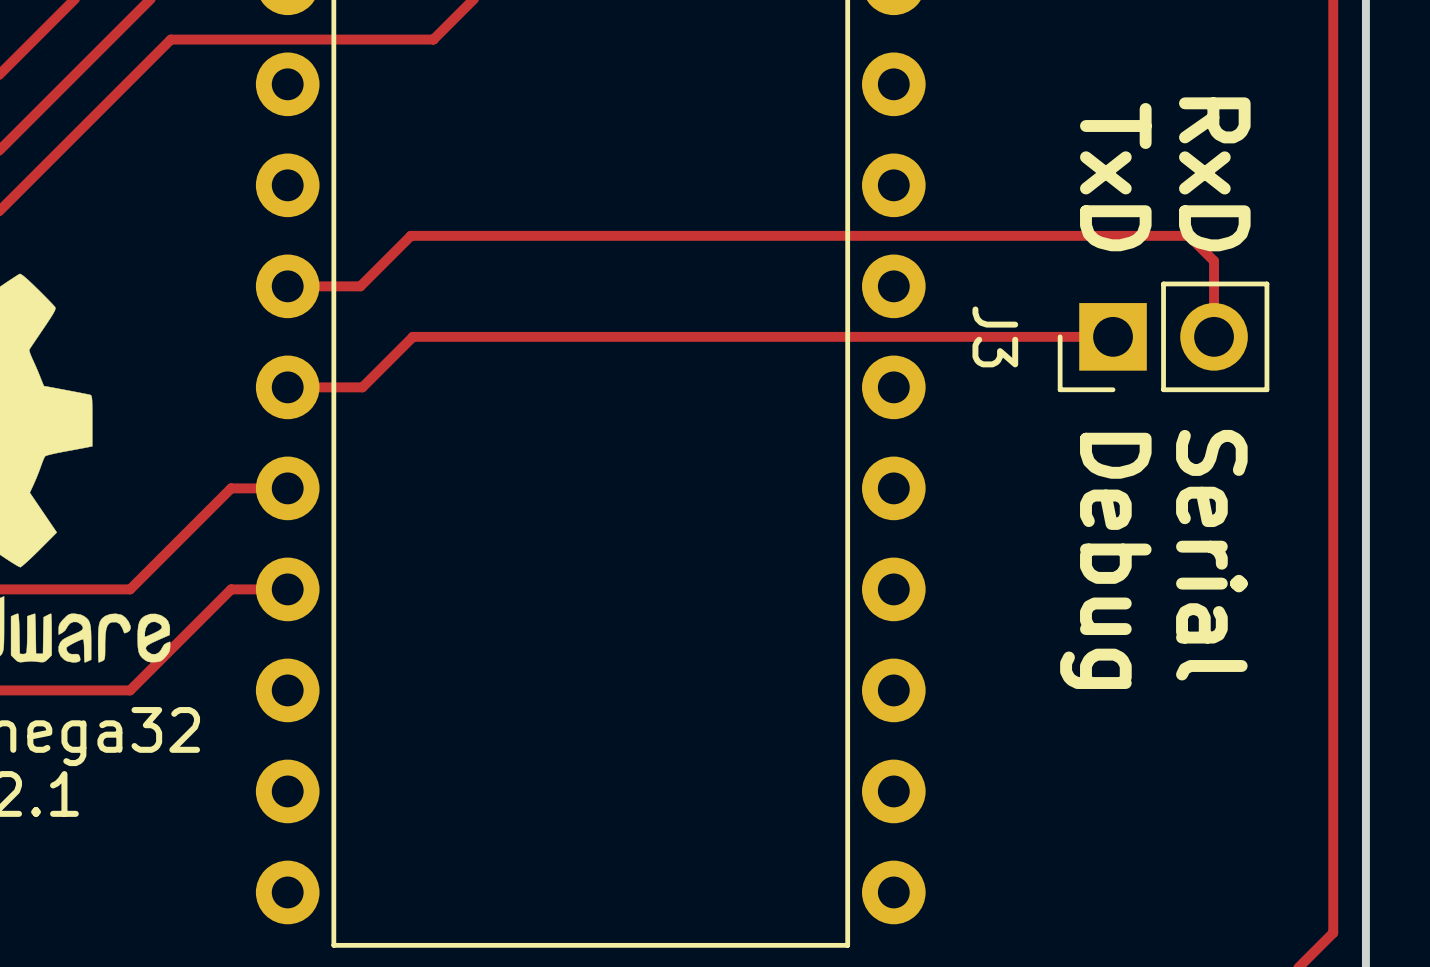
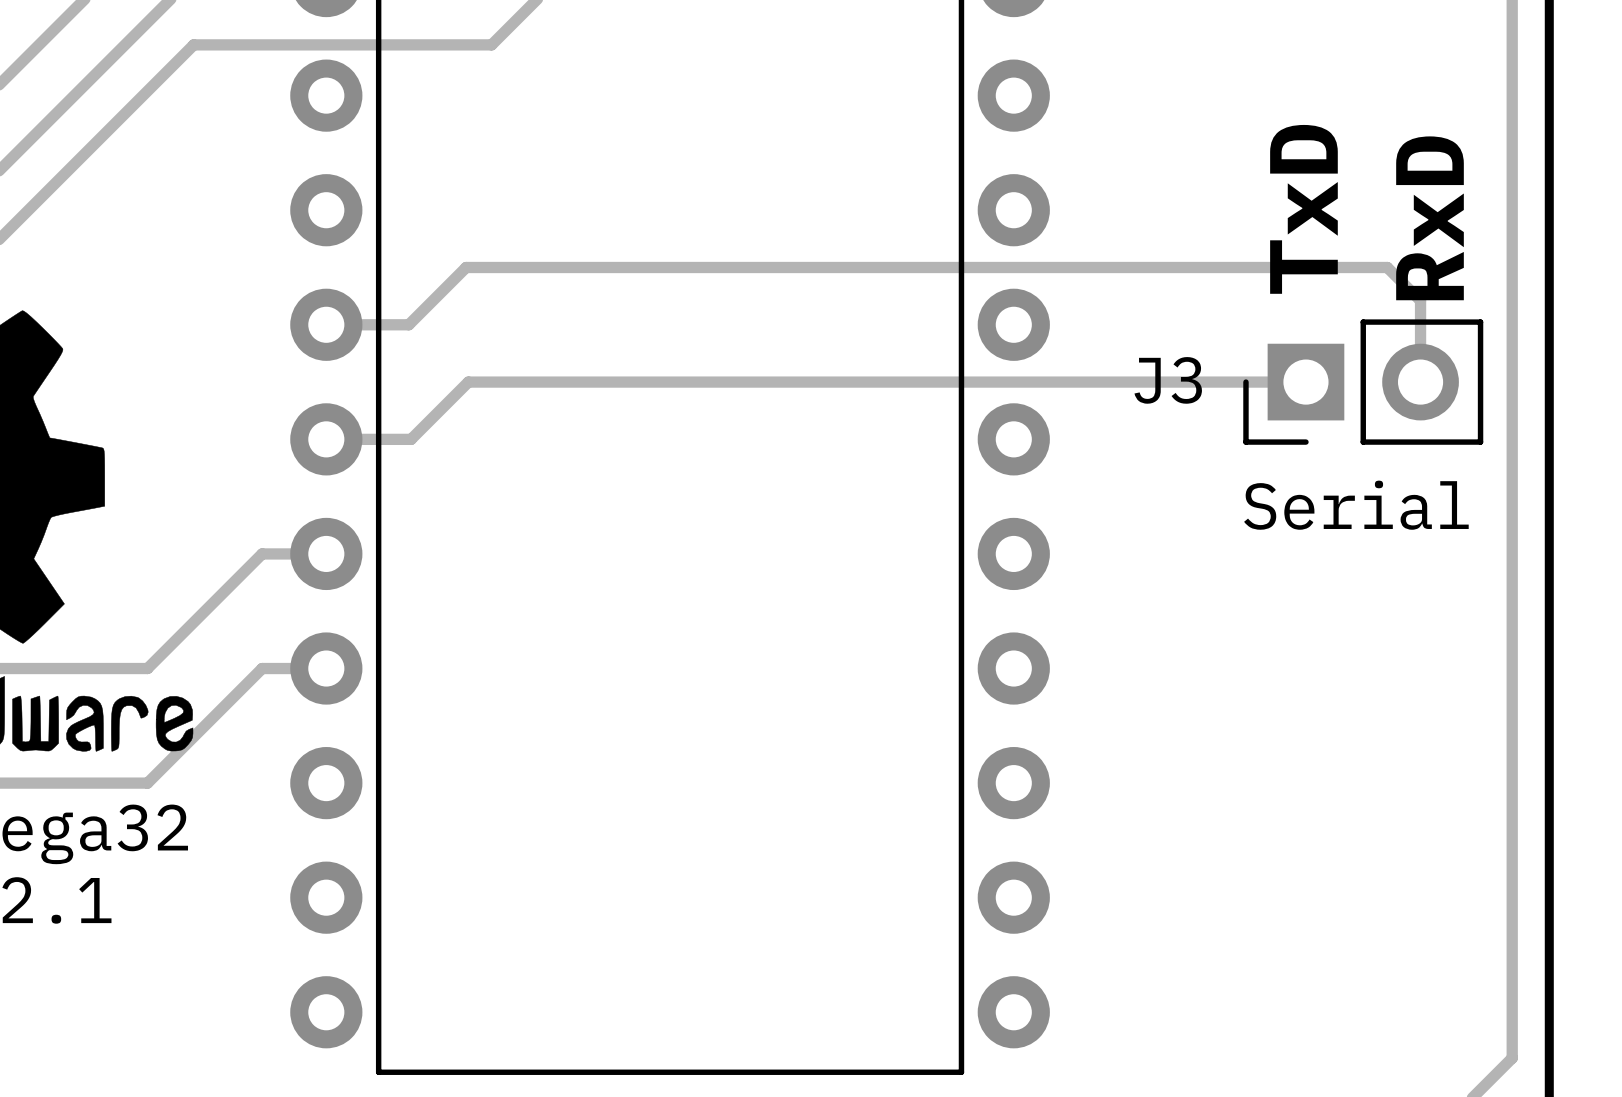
text rotation: 0° (1214, 174) -> 180° (1430, 218)
text rotation: 0° (1115, 177) -> 180° (1303, 209)
track: (1188, 235) (1214, 261) (1214, 336) -> (1348, 267) (1387, 267) (1420, 300) (1420, 382)
J3 name rotation: 0° (995, 336) -> 90° counterclockwise (1168, 380)
J3 position: (1163, 336) -> (1363, 382)
J3 value: none -> Serial (1356, 505)
text: Serial (1211, 555) -> none
text: Debug (1105, 560) -> none

